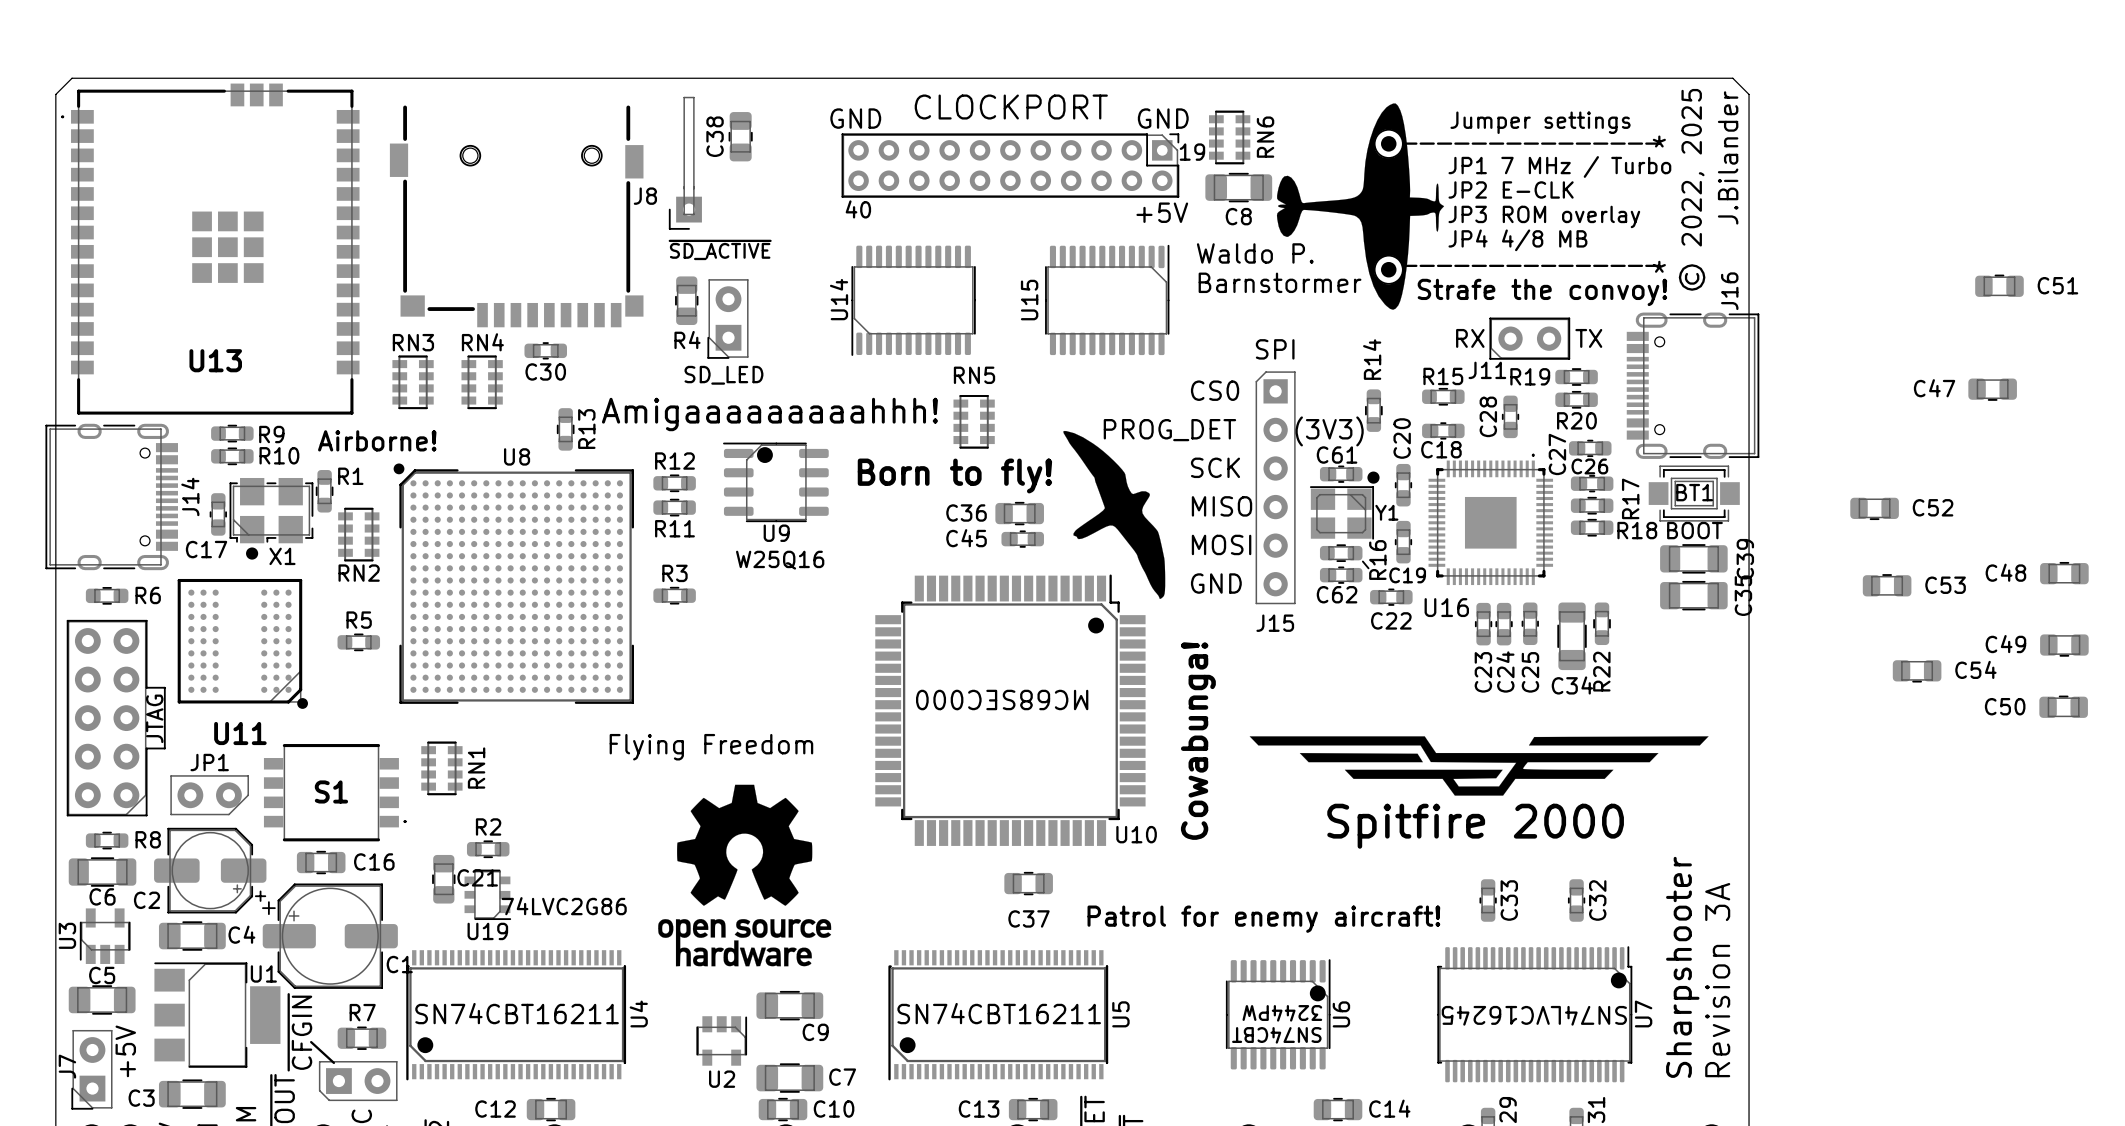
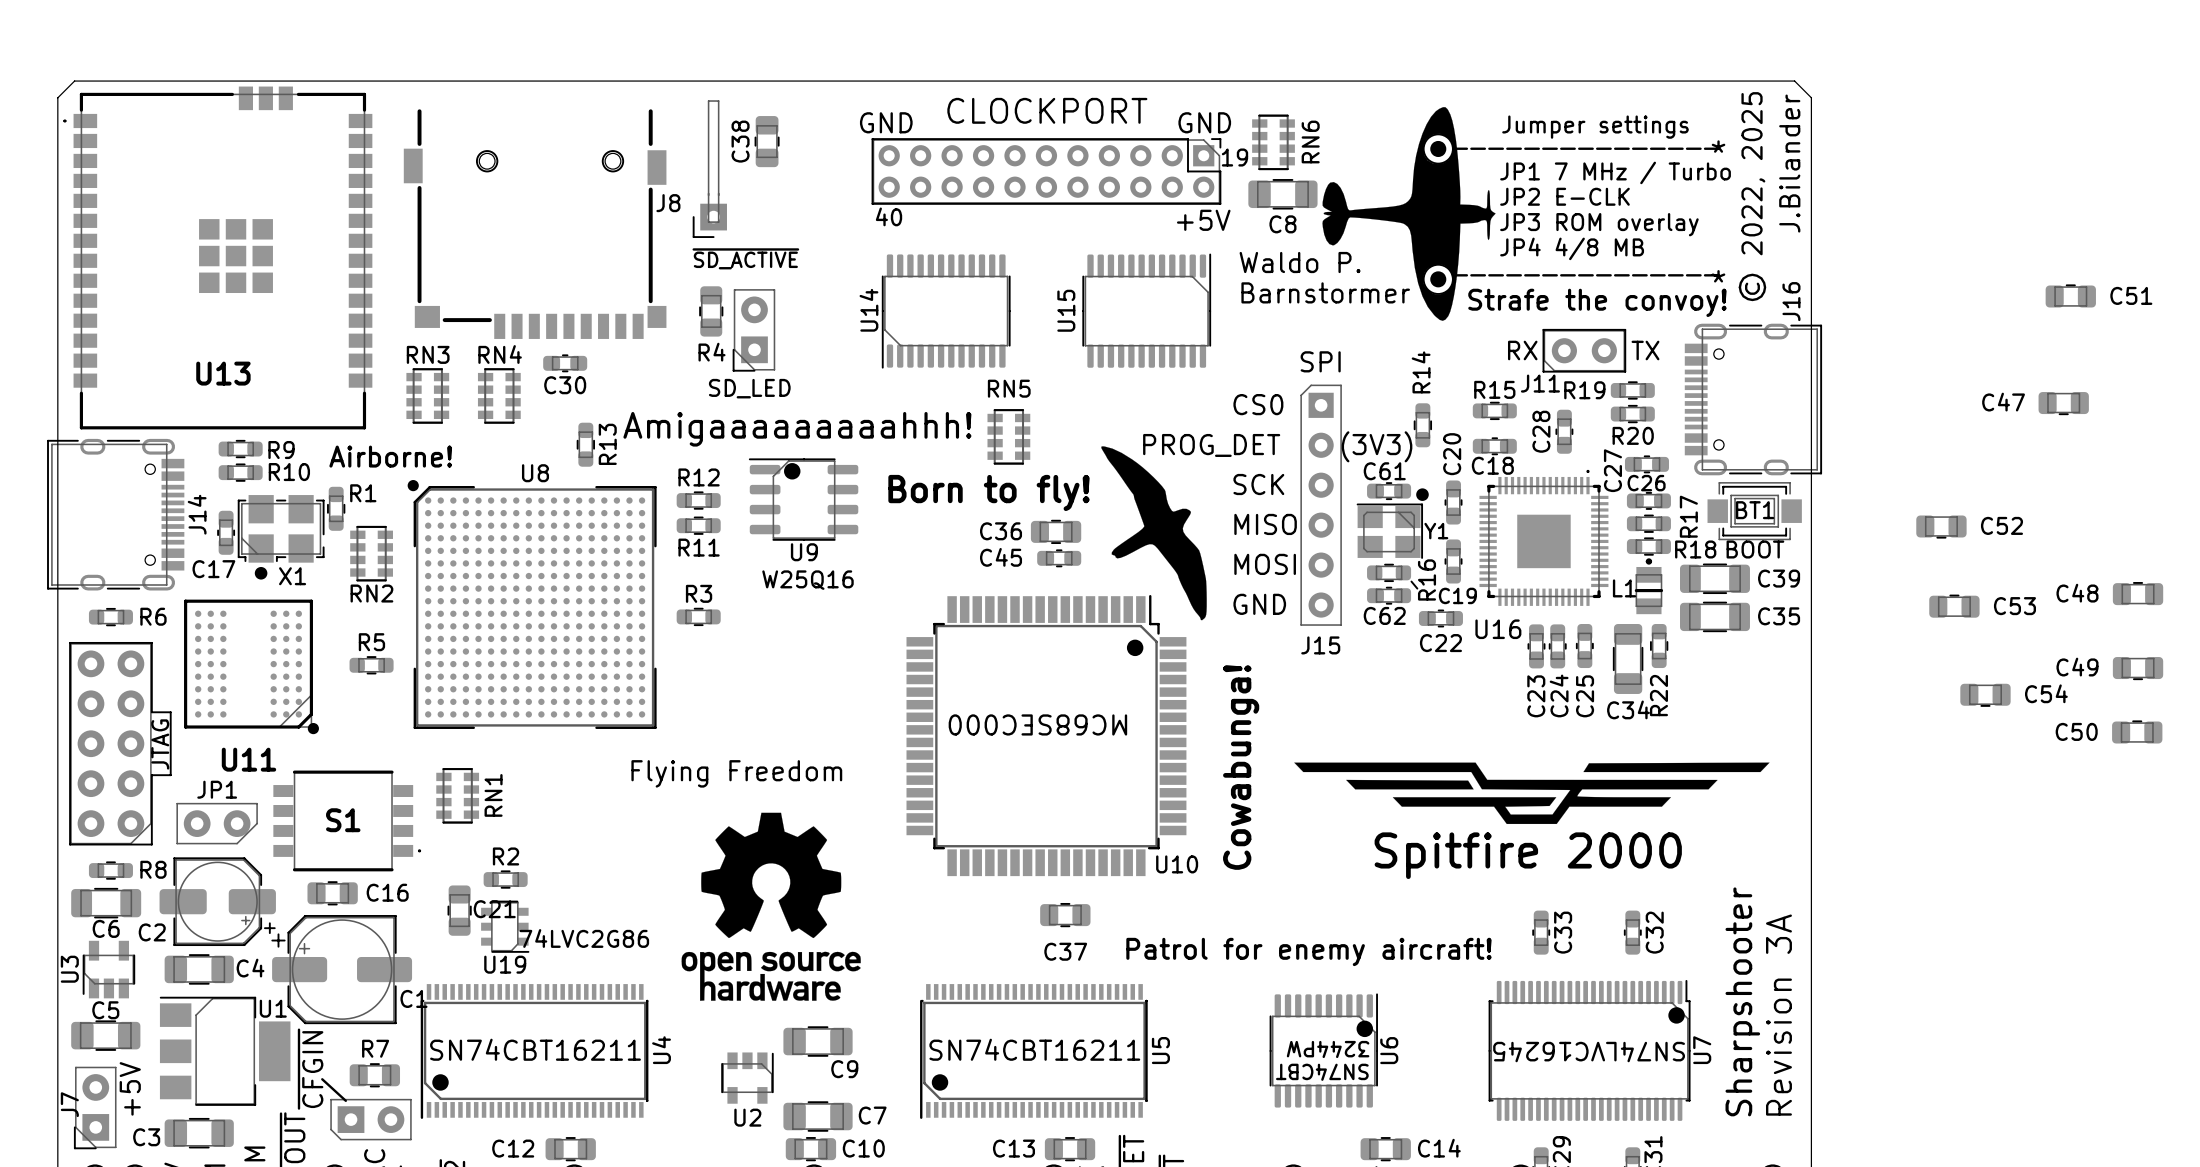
C39 position: (1693, 558) -> (1714, 578)
C39 name rotation: 0° (1745, 559) -> 90° clockwise (1779, 578)
L1: none -> (1648, 586)
C35 position: (1693, 595) -> (1714, 616)
C35 name rotation: 0° (1743, 595) -> 90° clockwise (1779, 616)

